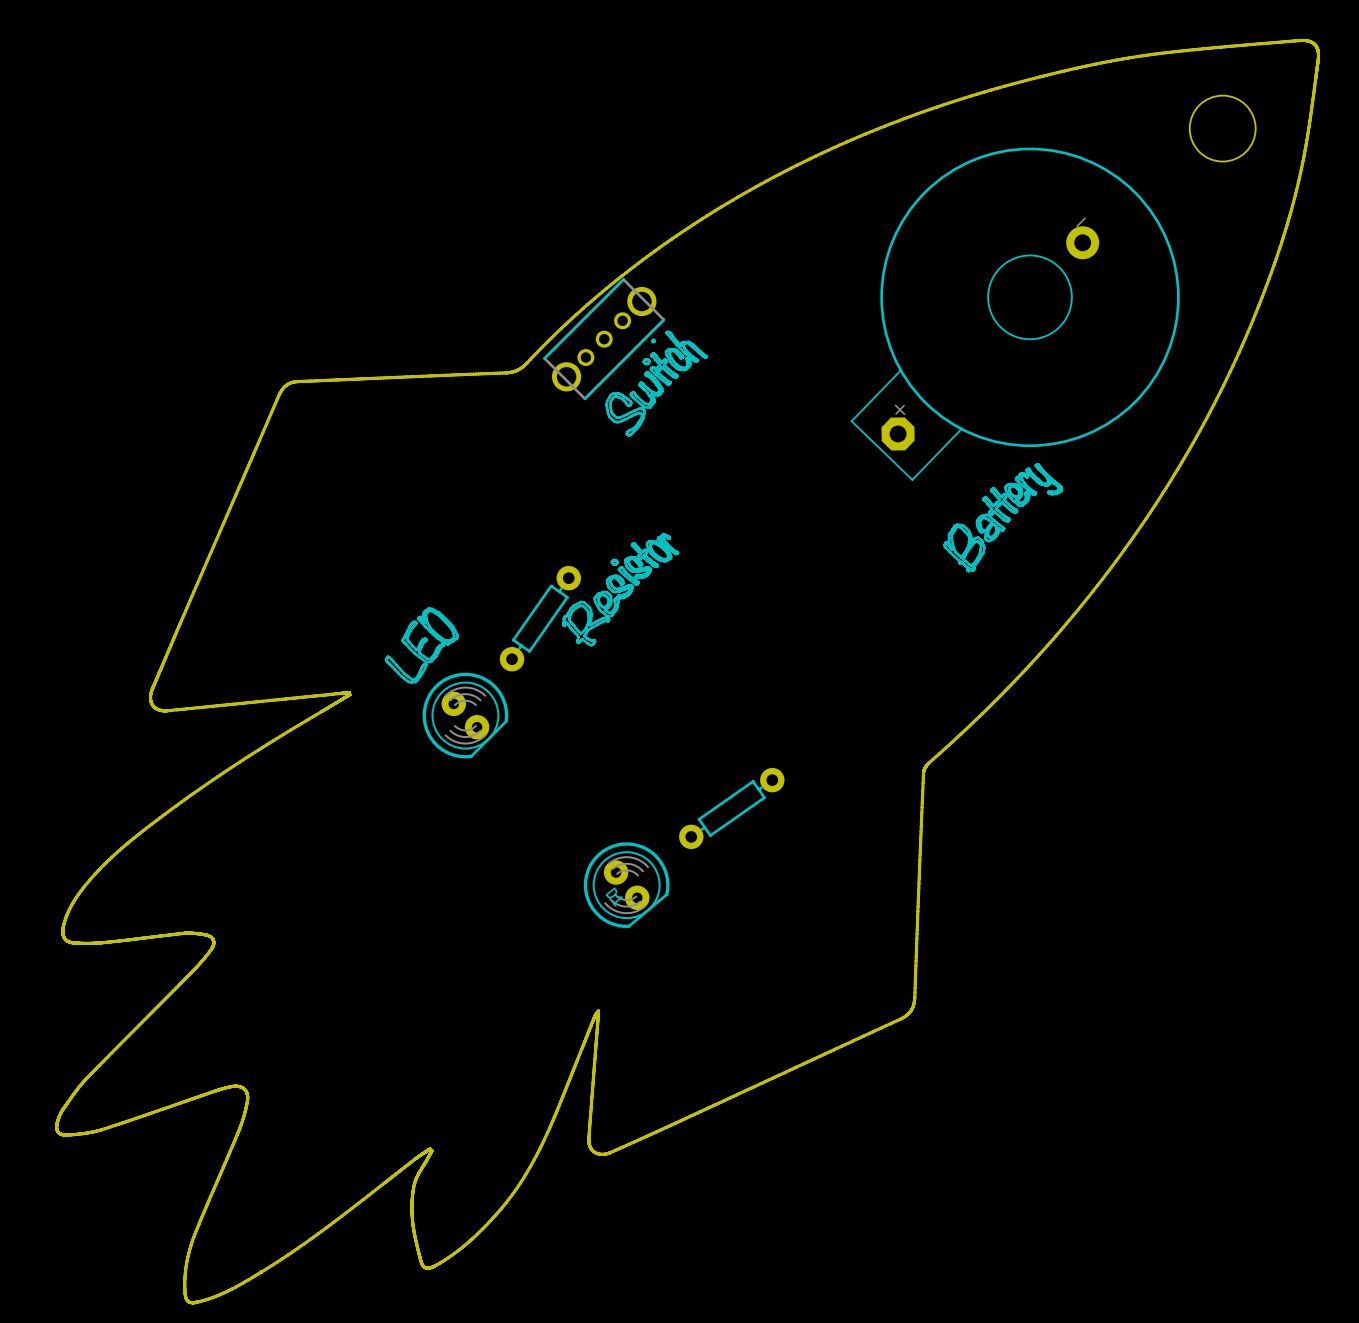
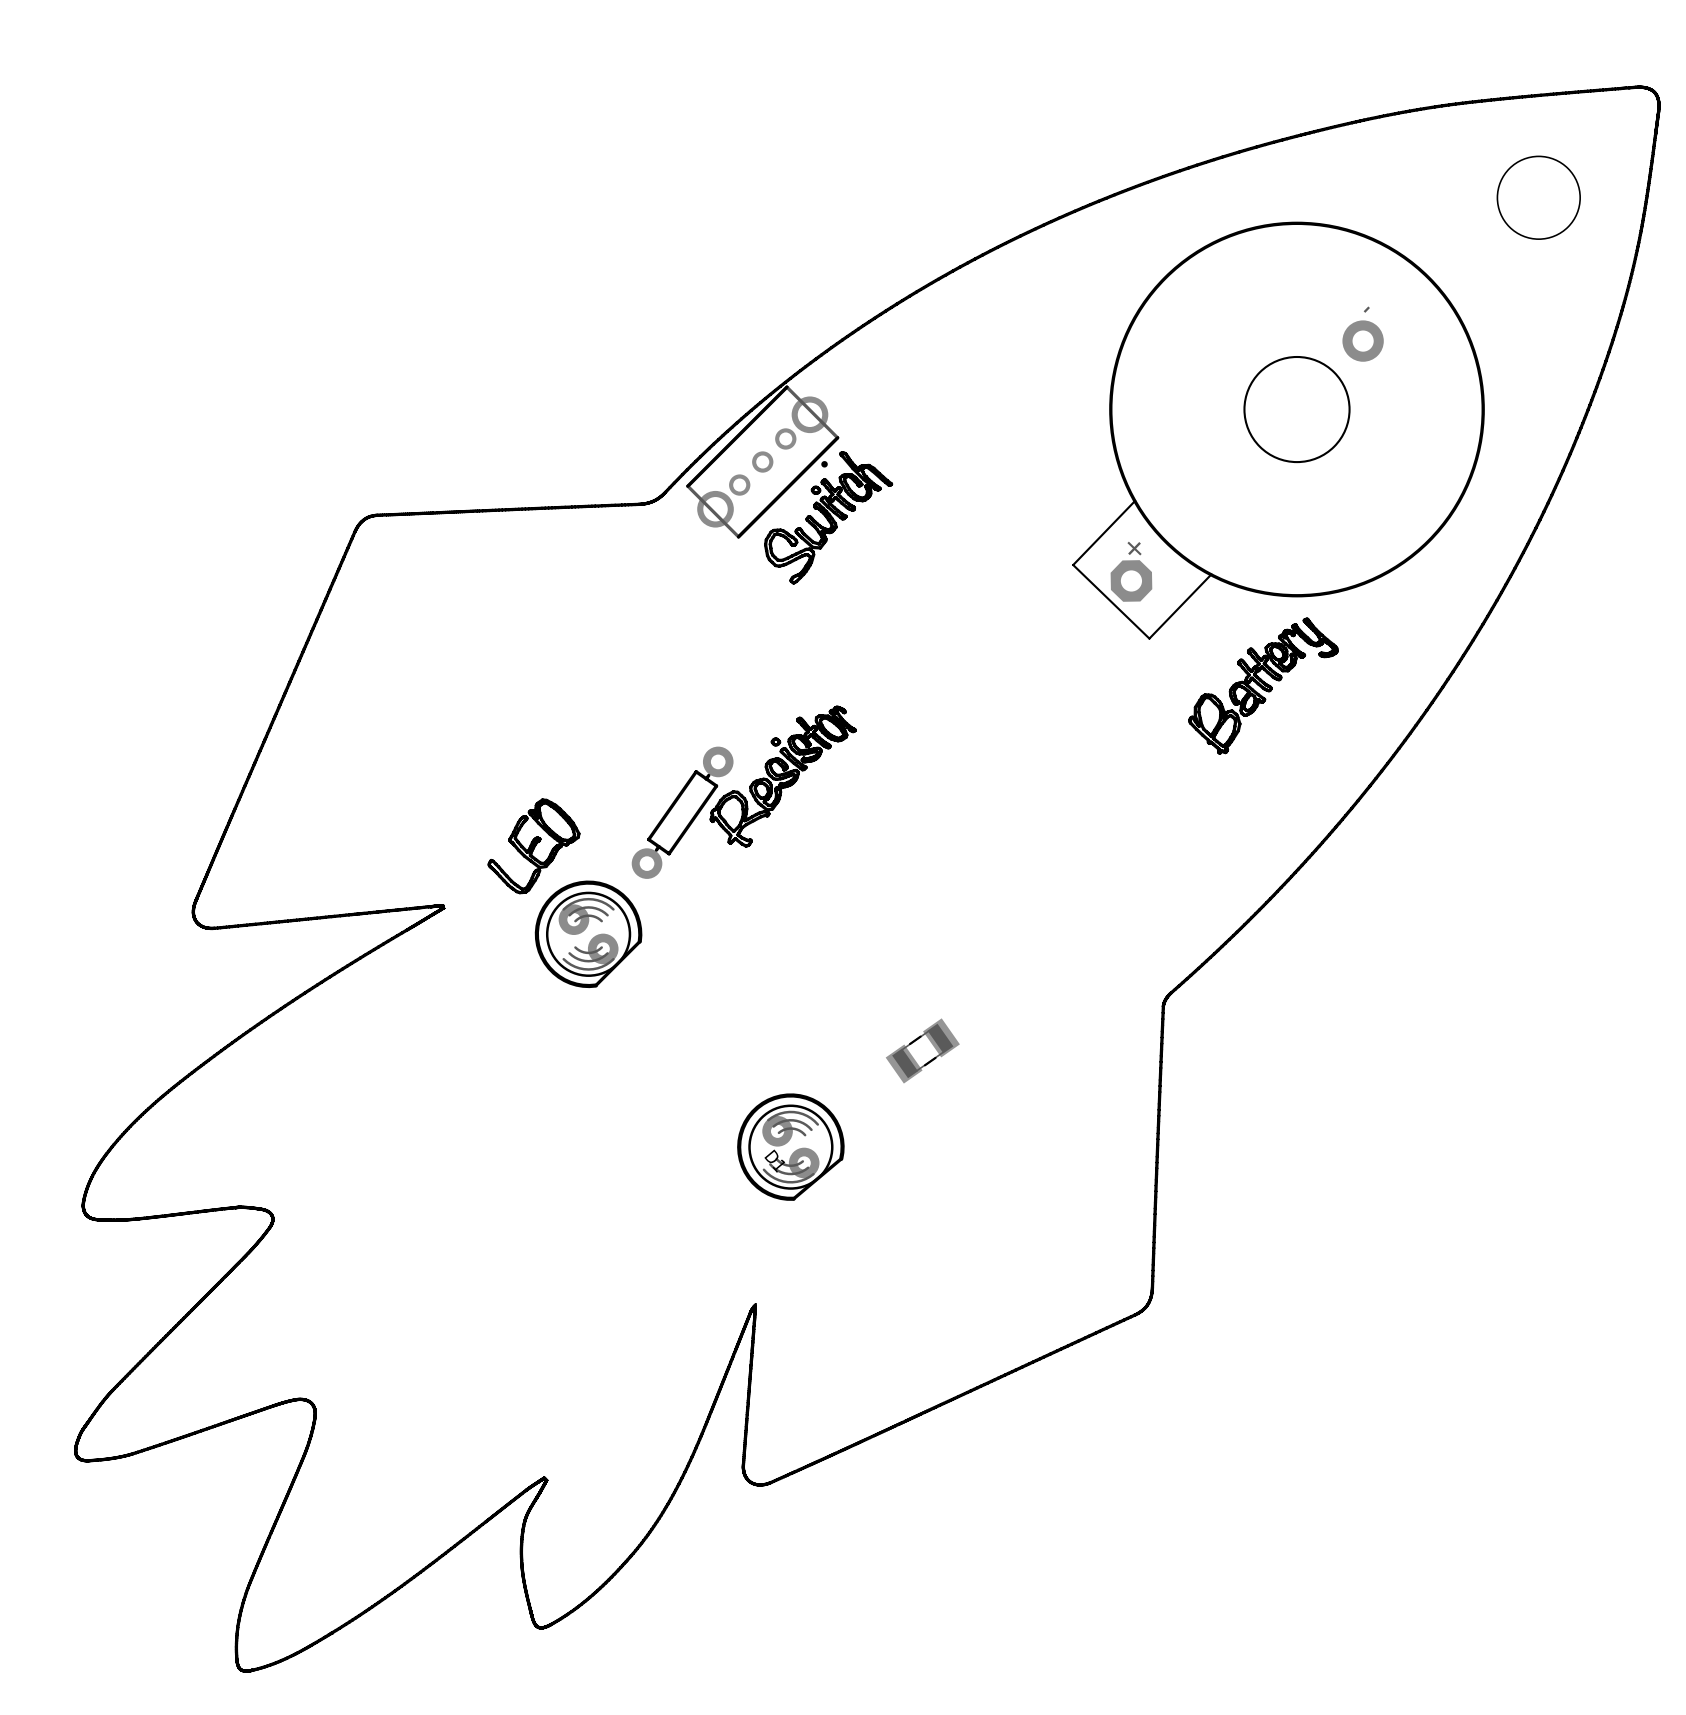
part footprint: [679, 767, 785, 850] -> [885, 1018, 960, 1084]

